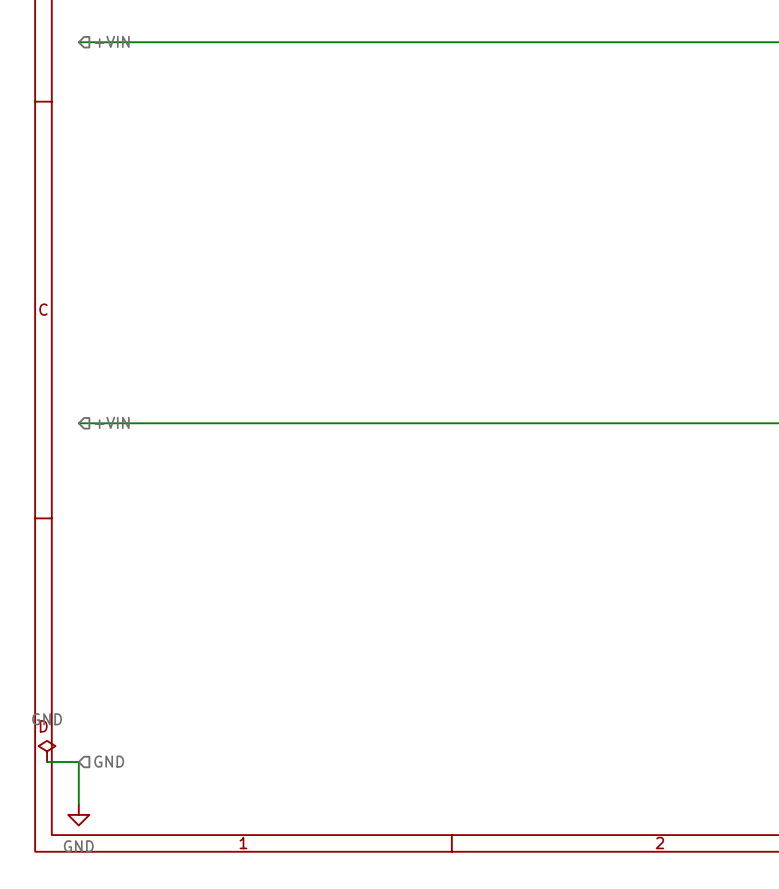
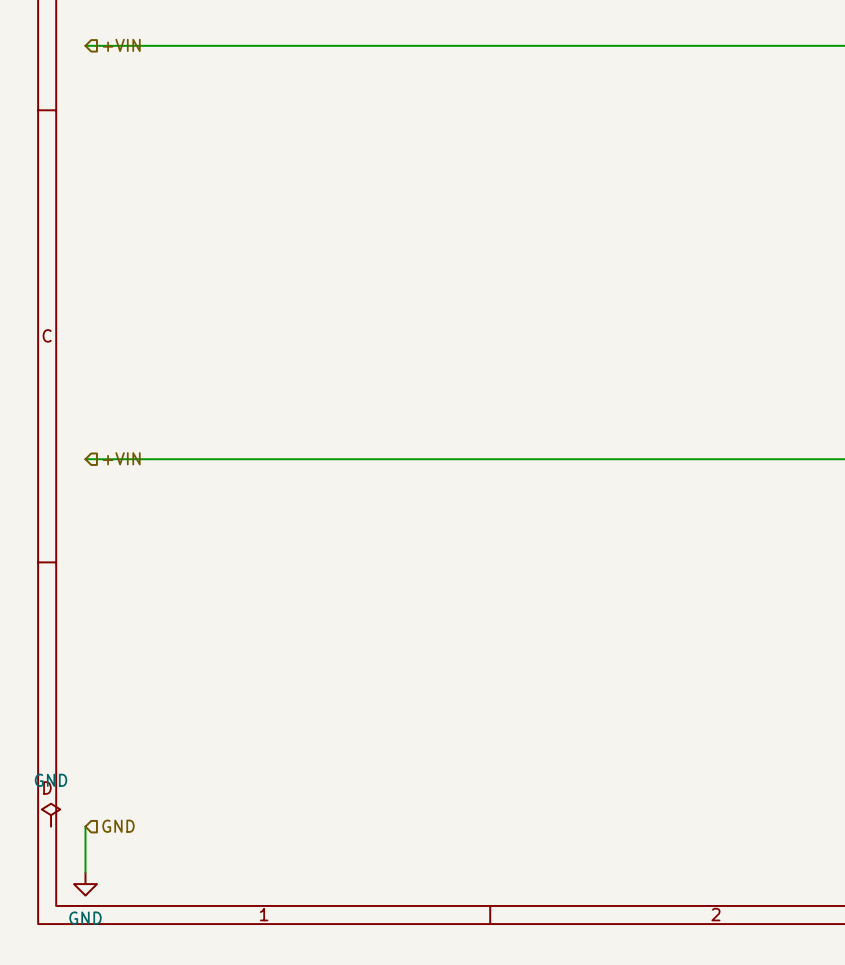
wire: (47, 762) (78, 762) -> none

